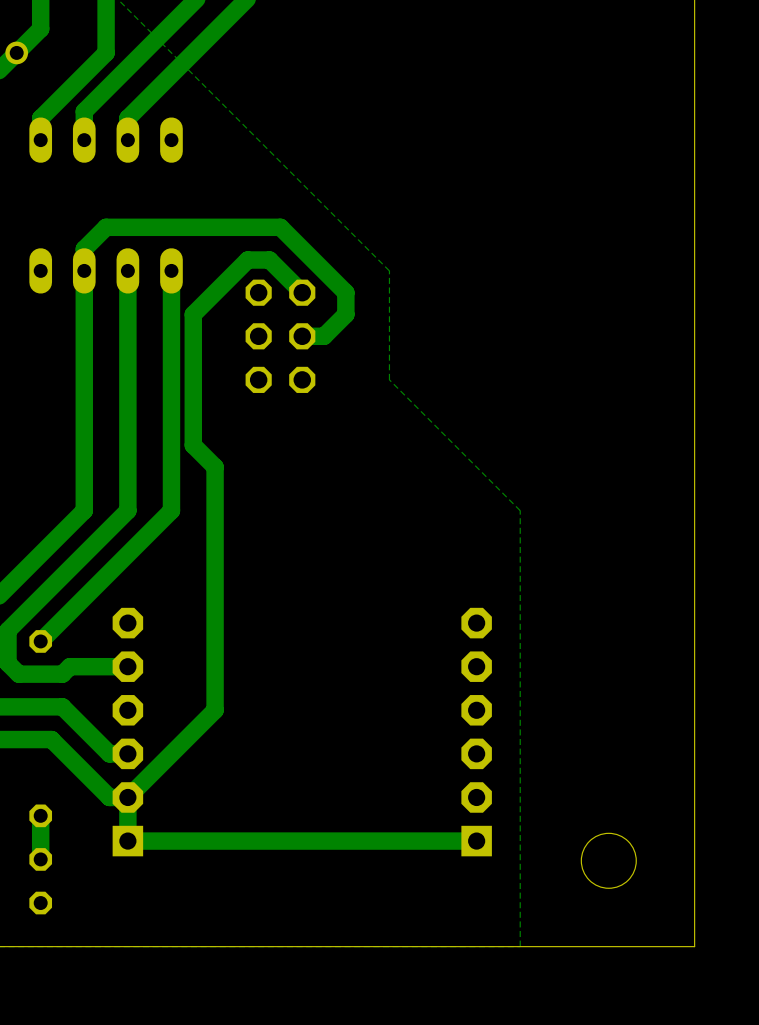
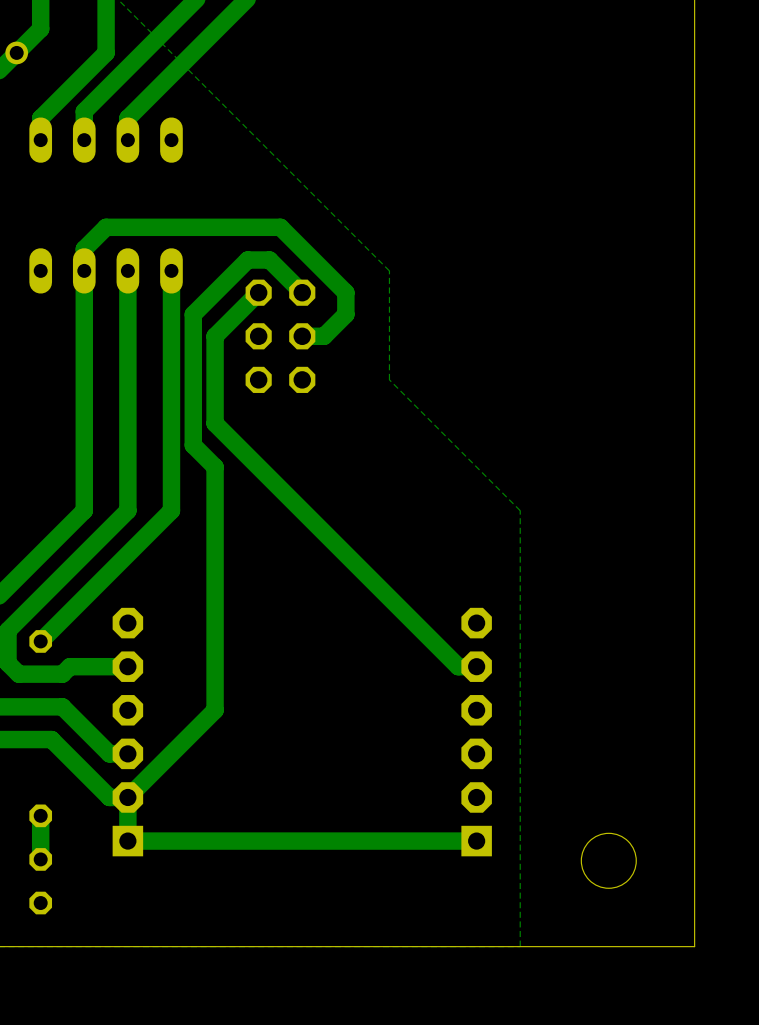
track: none -> (258, 292) (215, 336) (215, 423) (458, 666) (476, 666)

